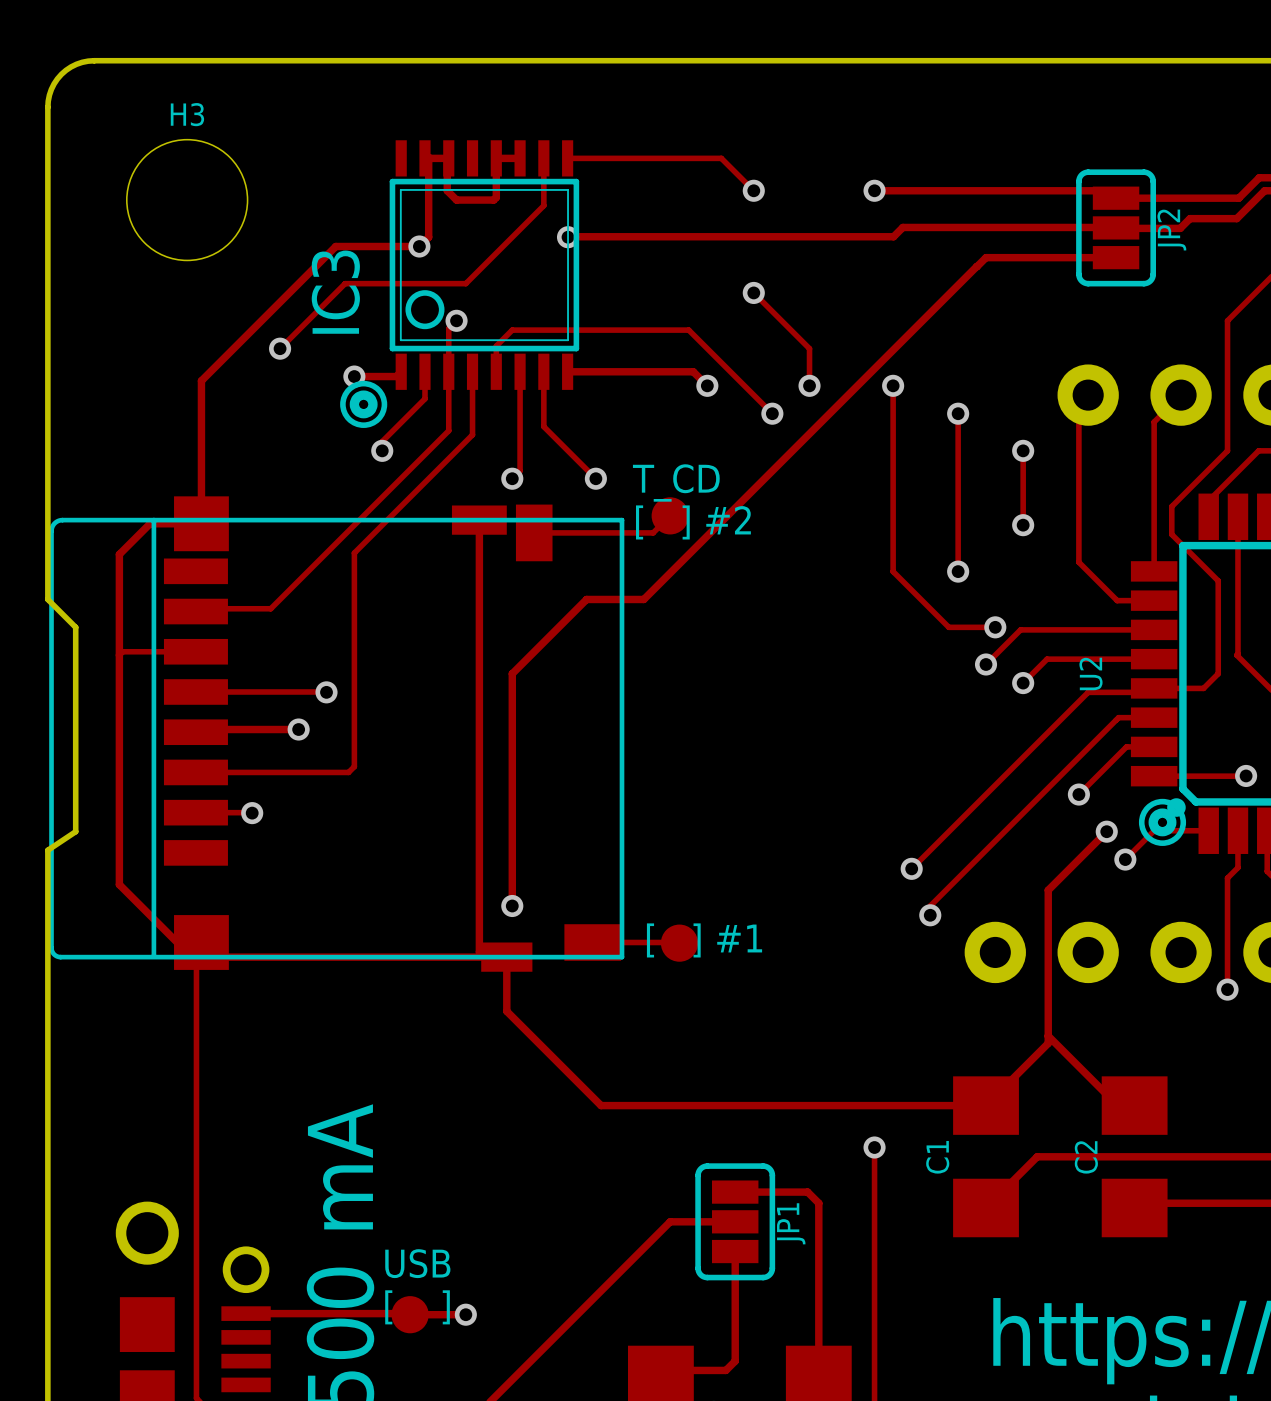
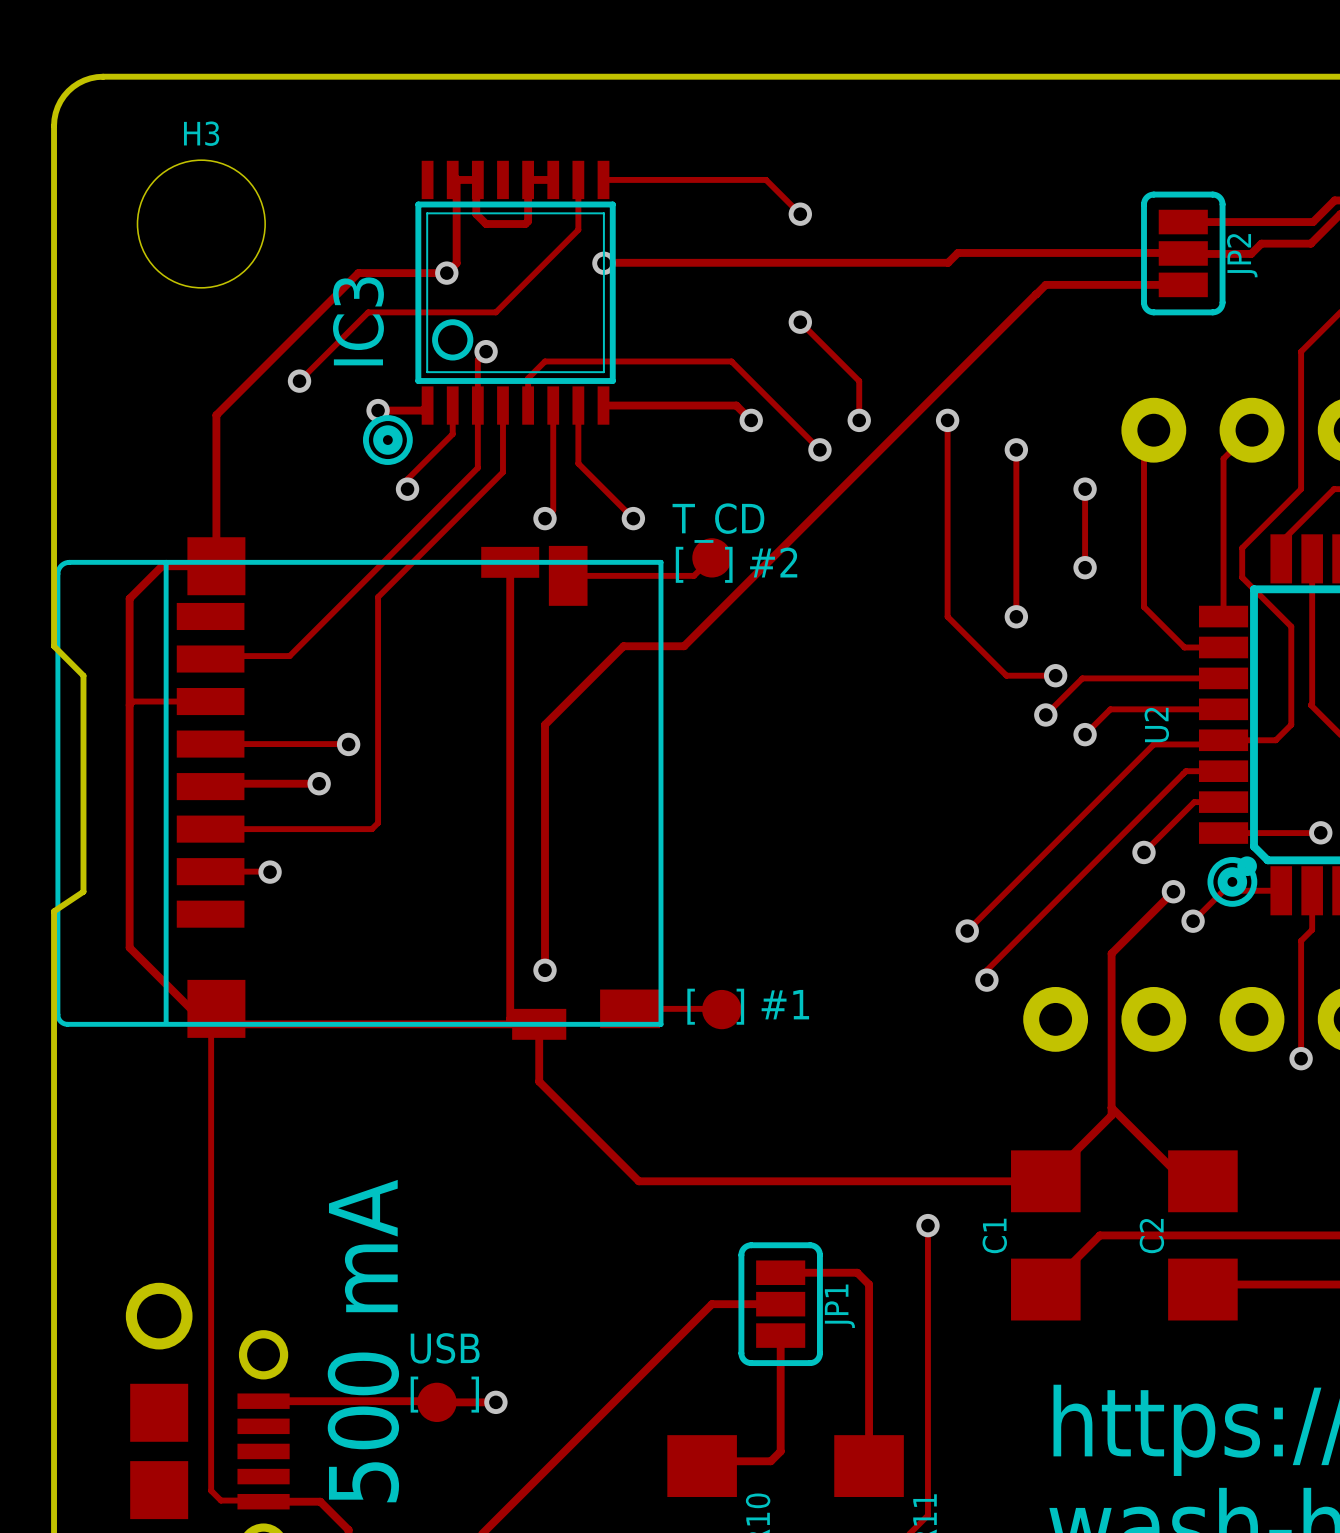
track: (874, 190) (1099, 190) (1106, 198) (1116, 198) -> none
via: (874, 190) -> none

